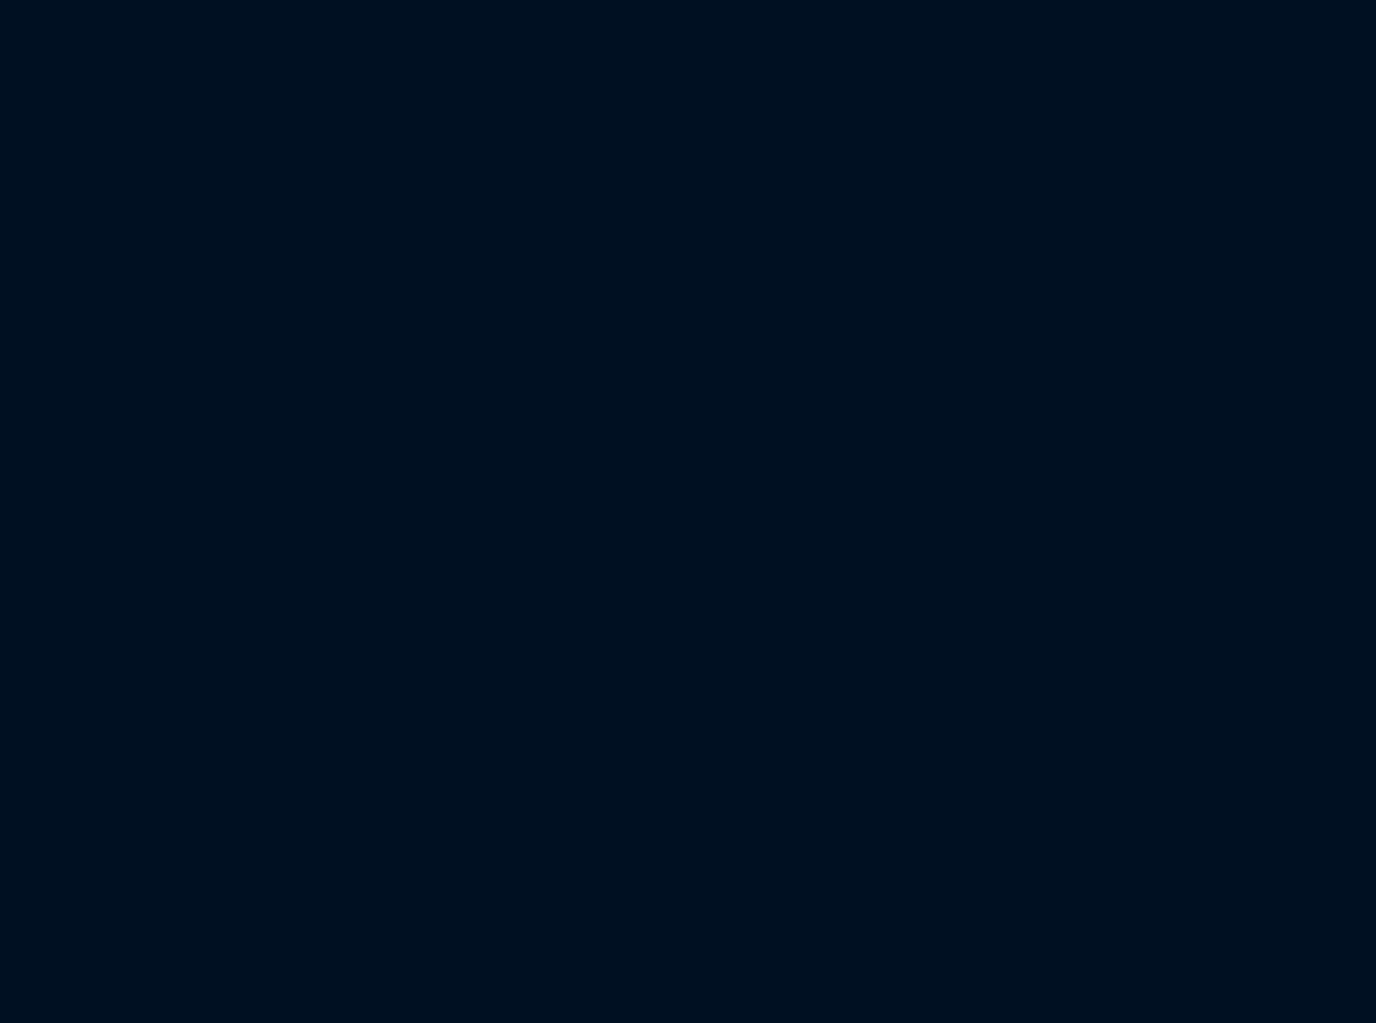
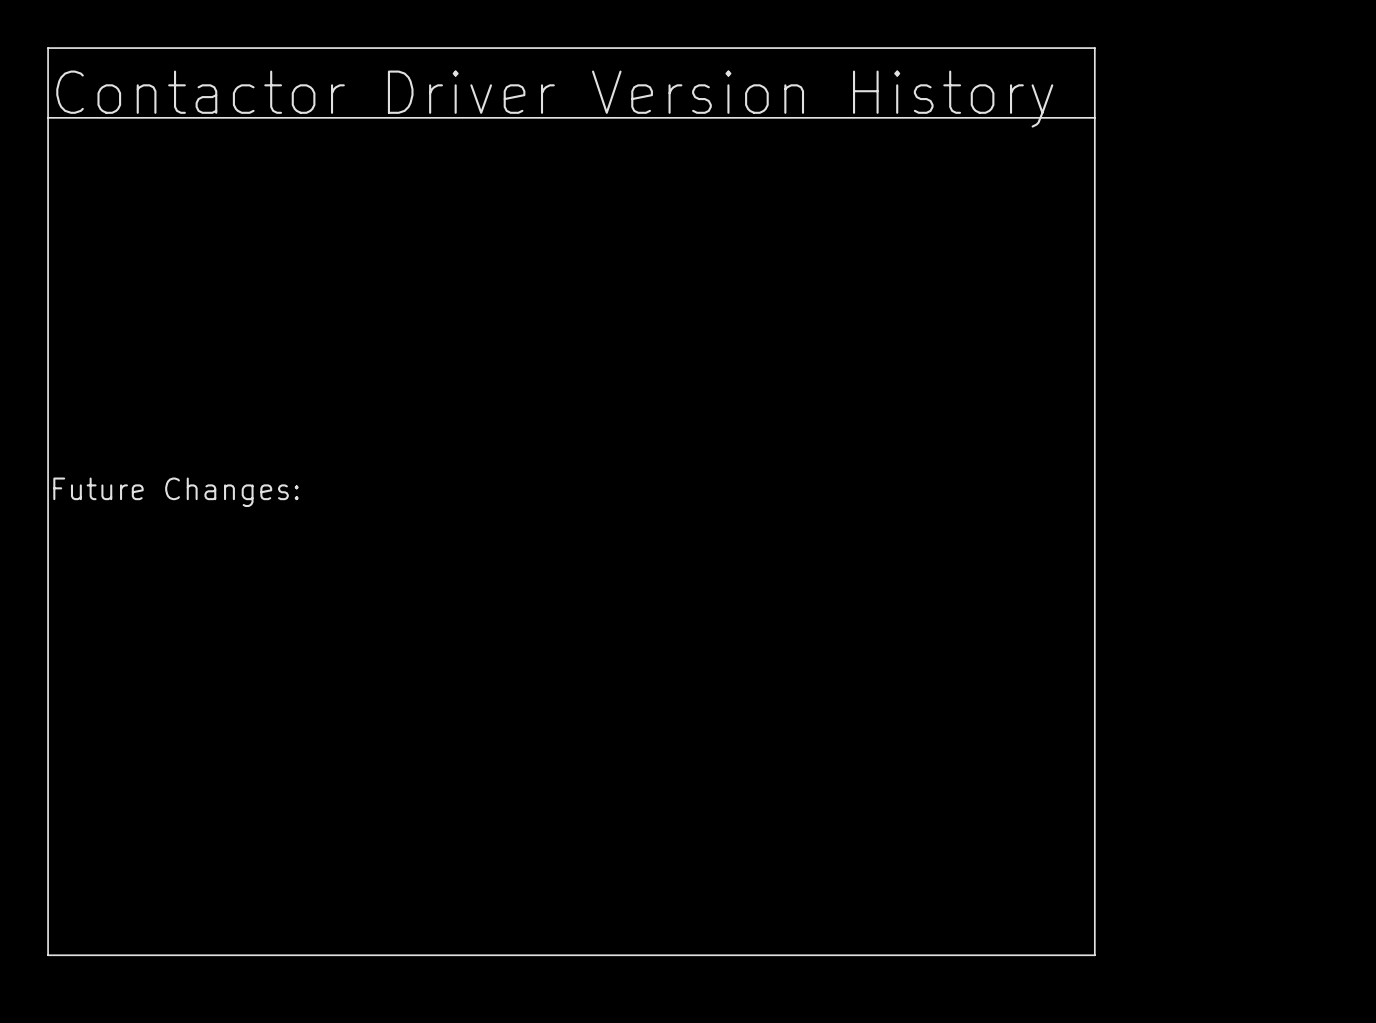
line: none -> (48, 48) (1094, 48) (1094, 955) (48, 955) (48, 48)
text: none -> Contactor Driver Version History (554, 99)
line: none -> (48, 117) (1094, 117)
text: none -> Future Changes: (175, 492)

